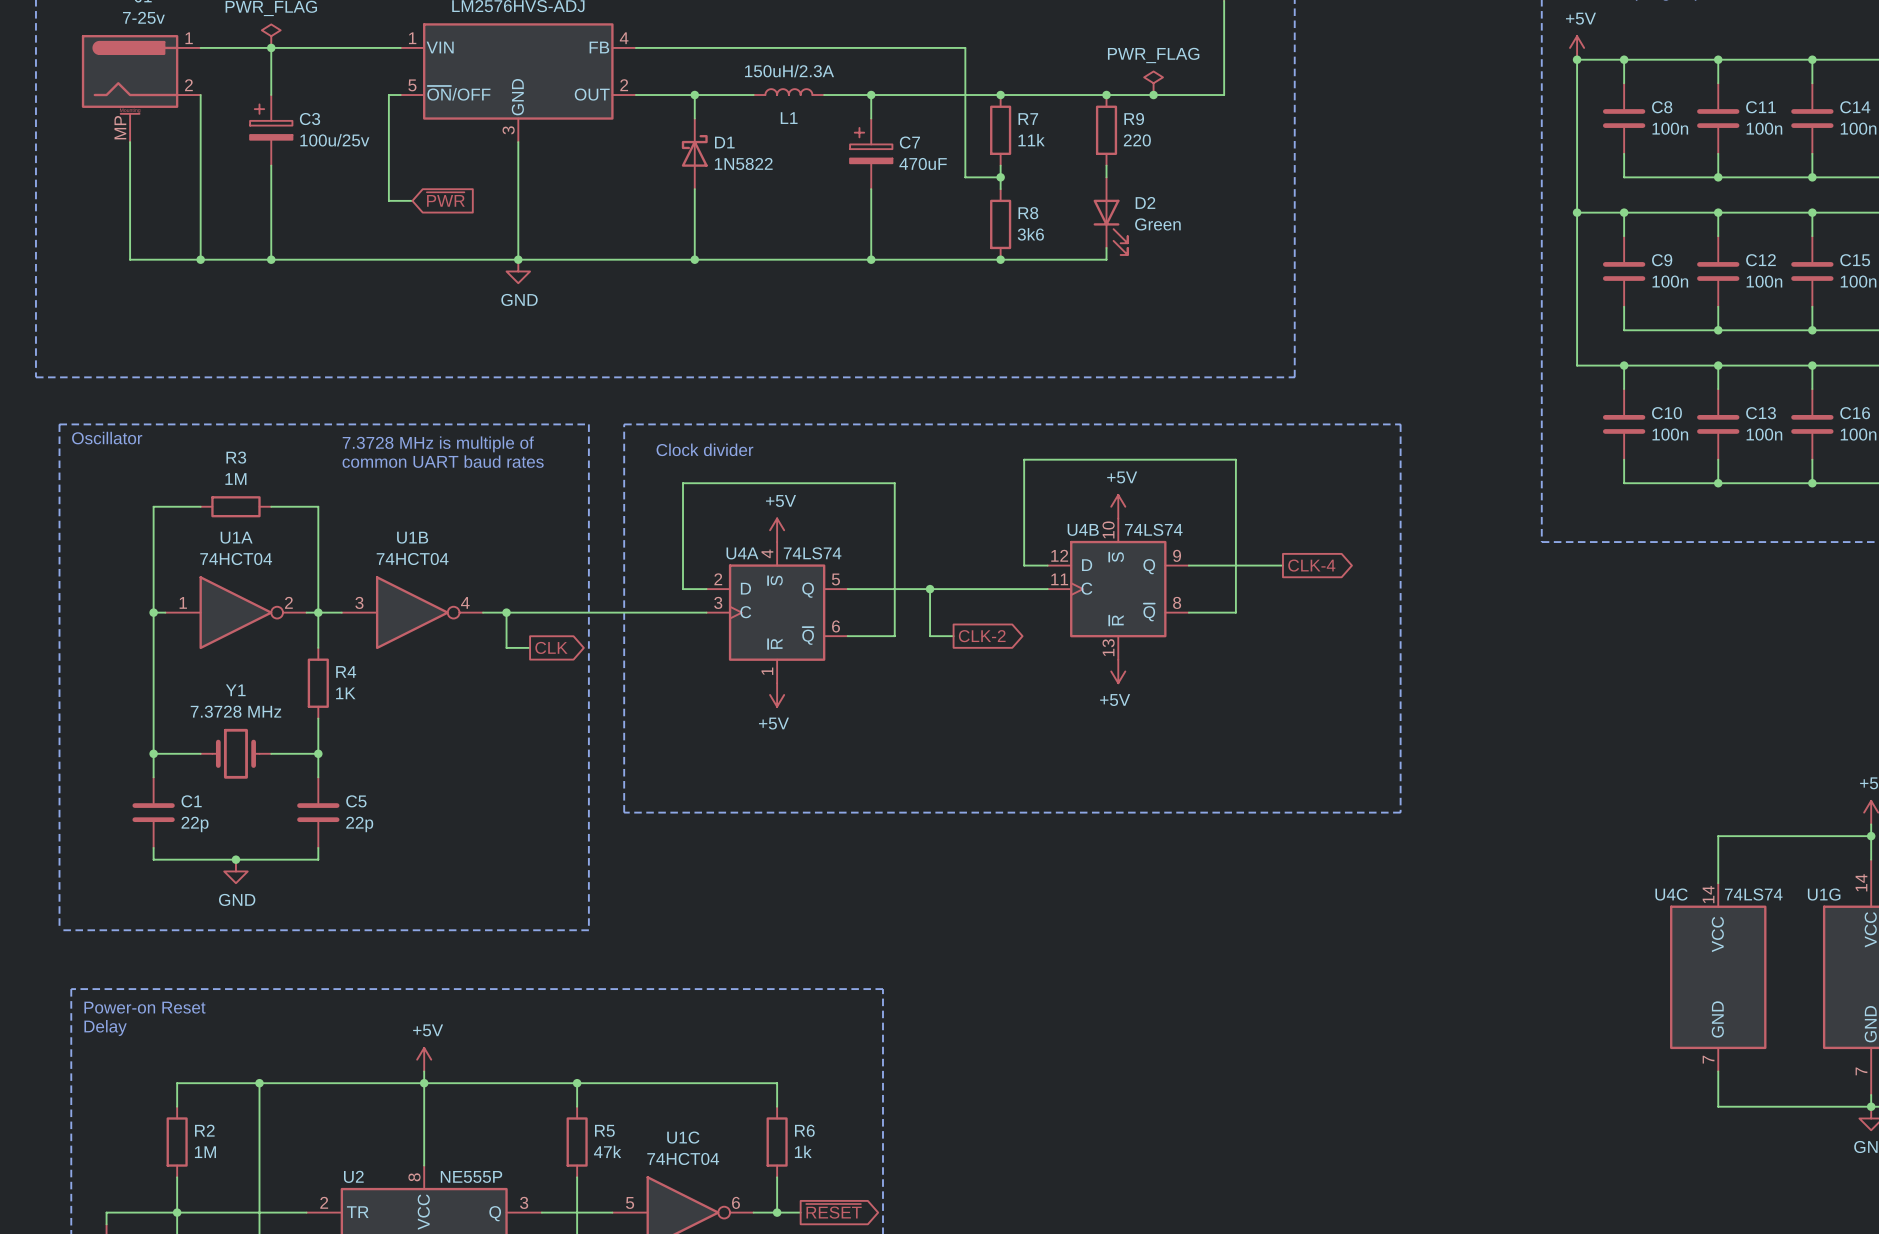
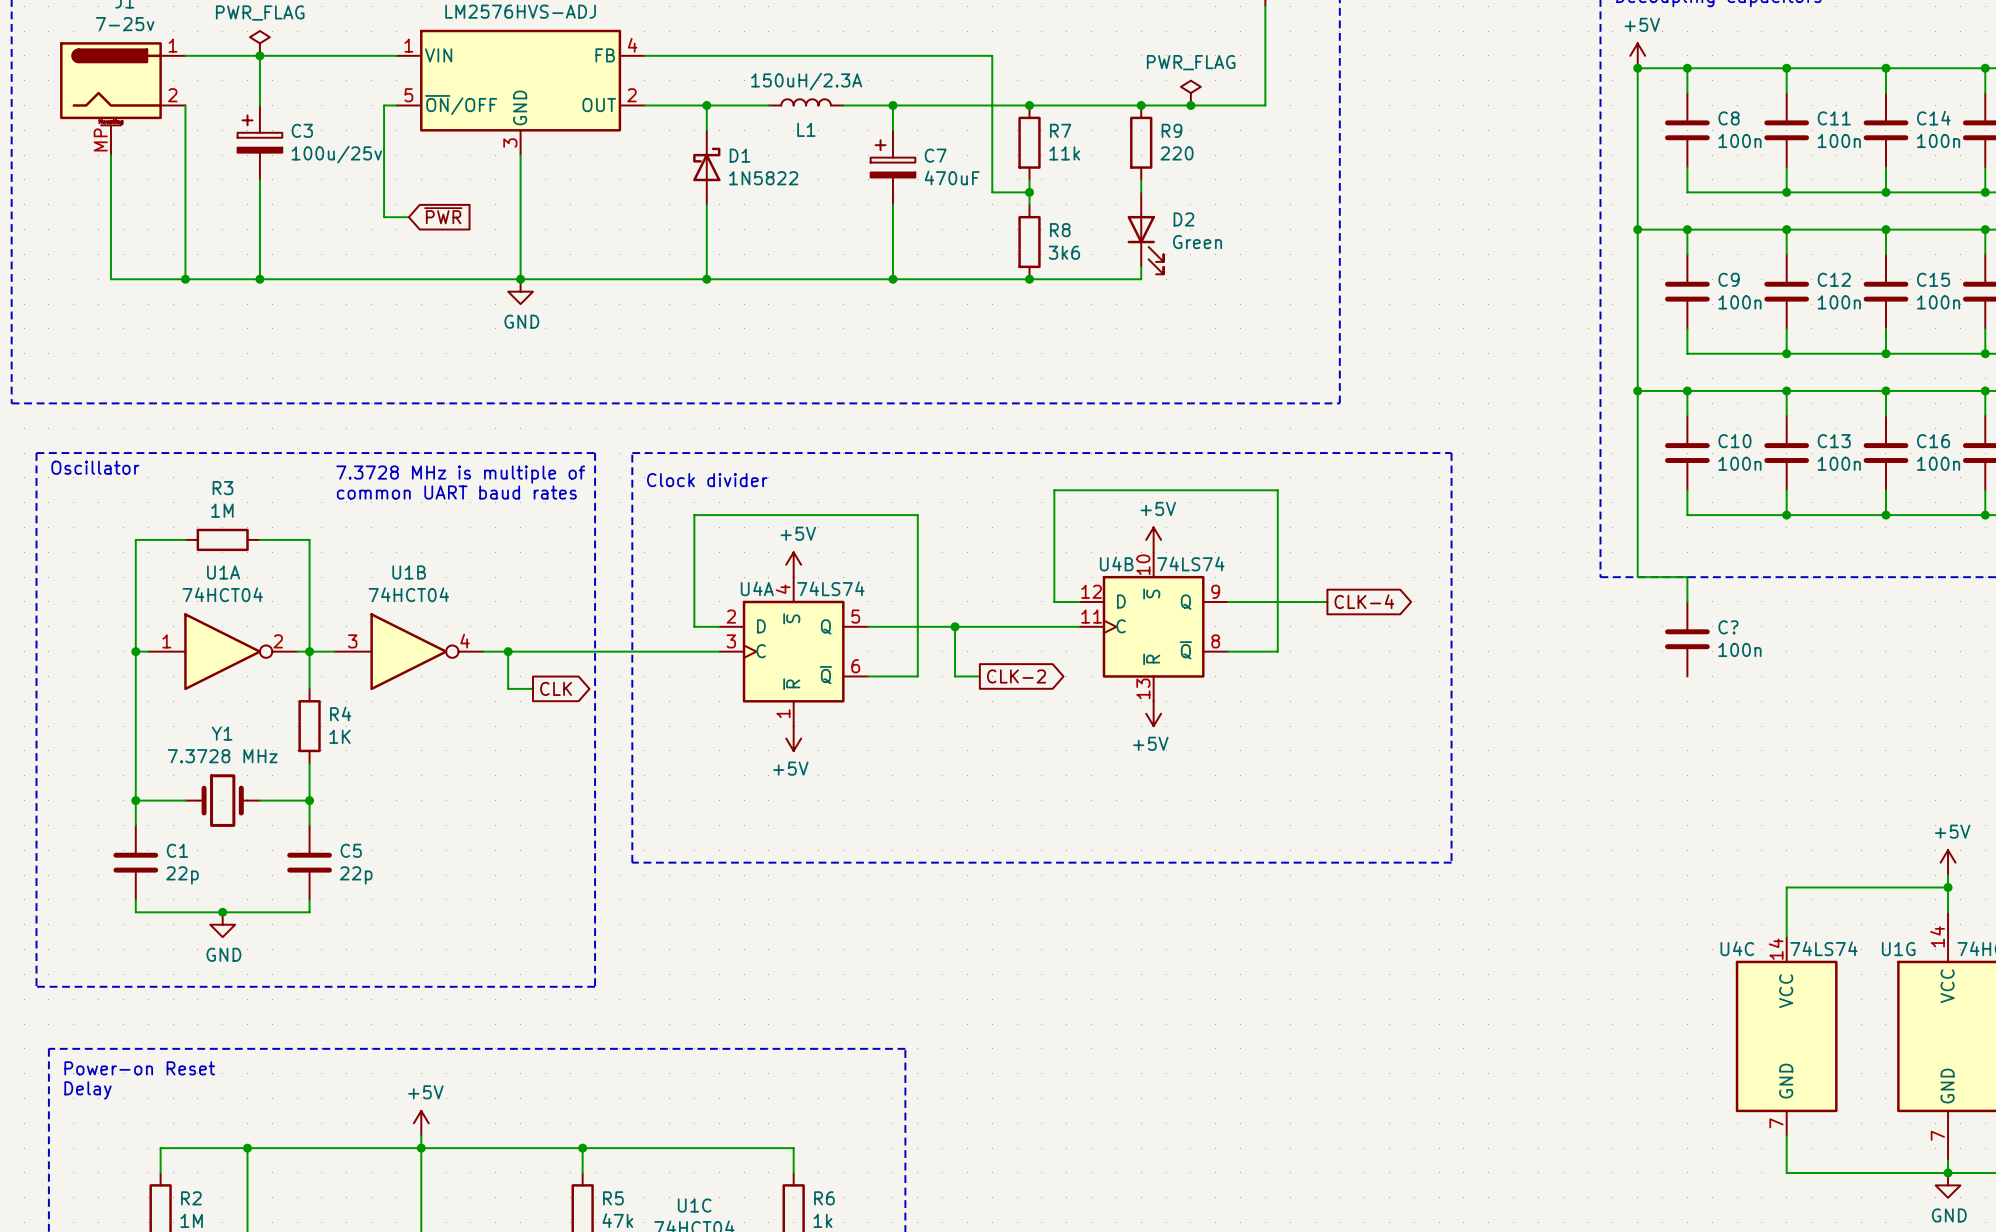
wire: none -> (1637, 390) (1637, 577) (1687, 577) (1687, 601)
junction: none -> (1637, 390)
C?: none -> 100n (1687, 639)

